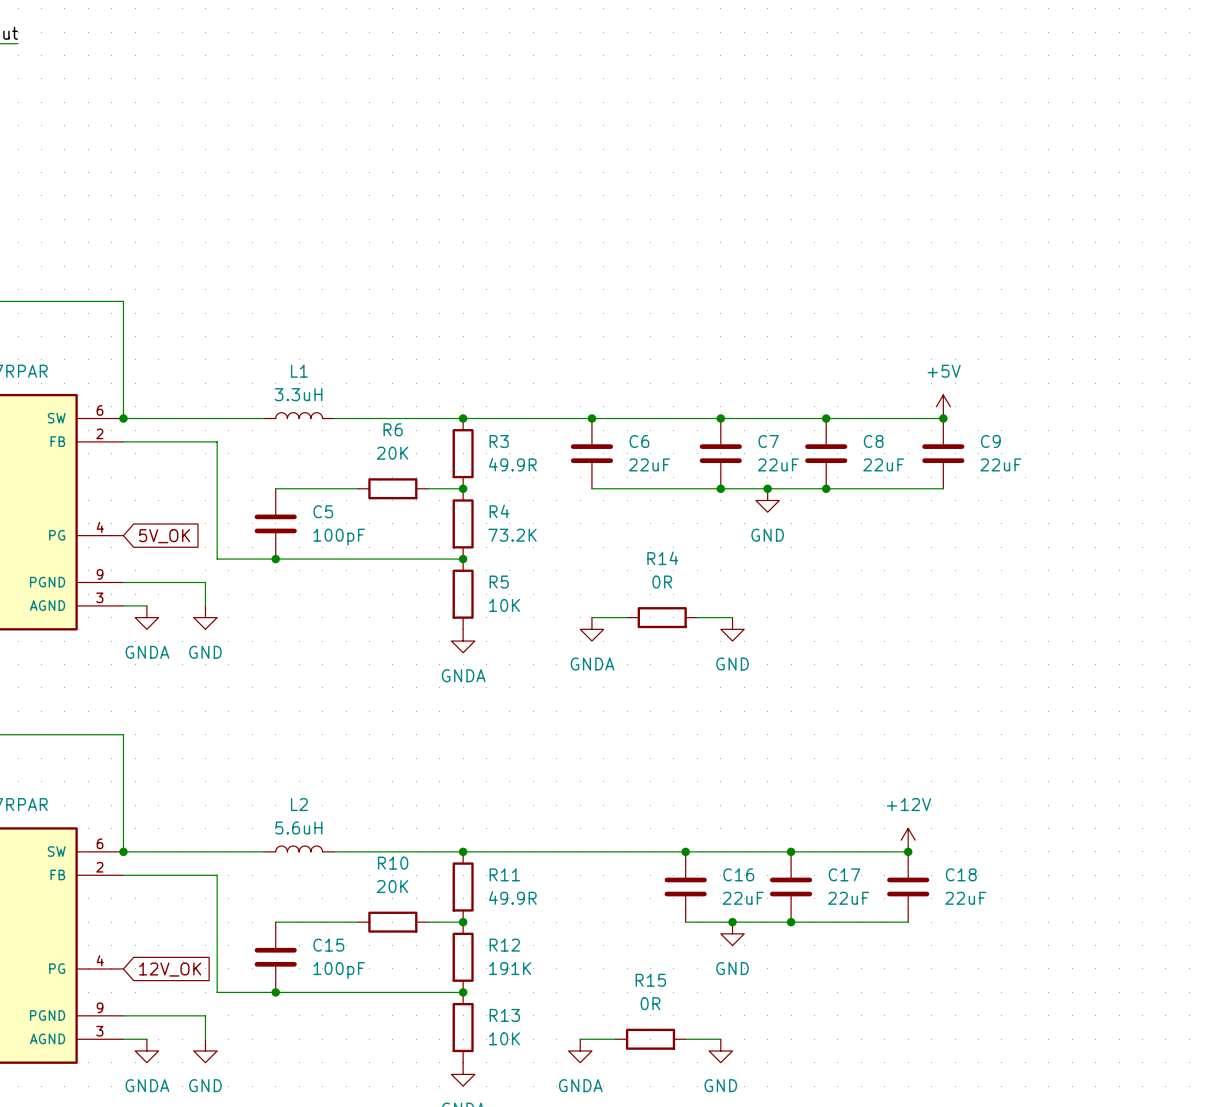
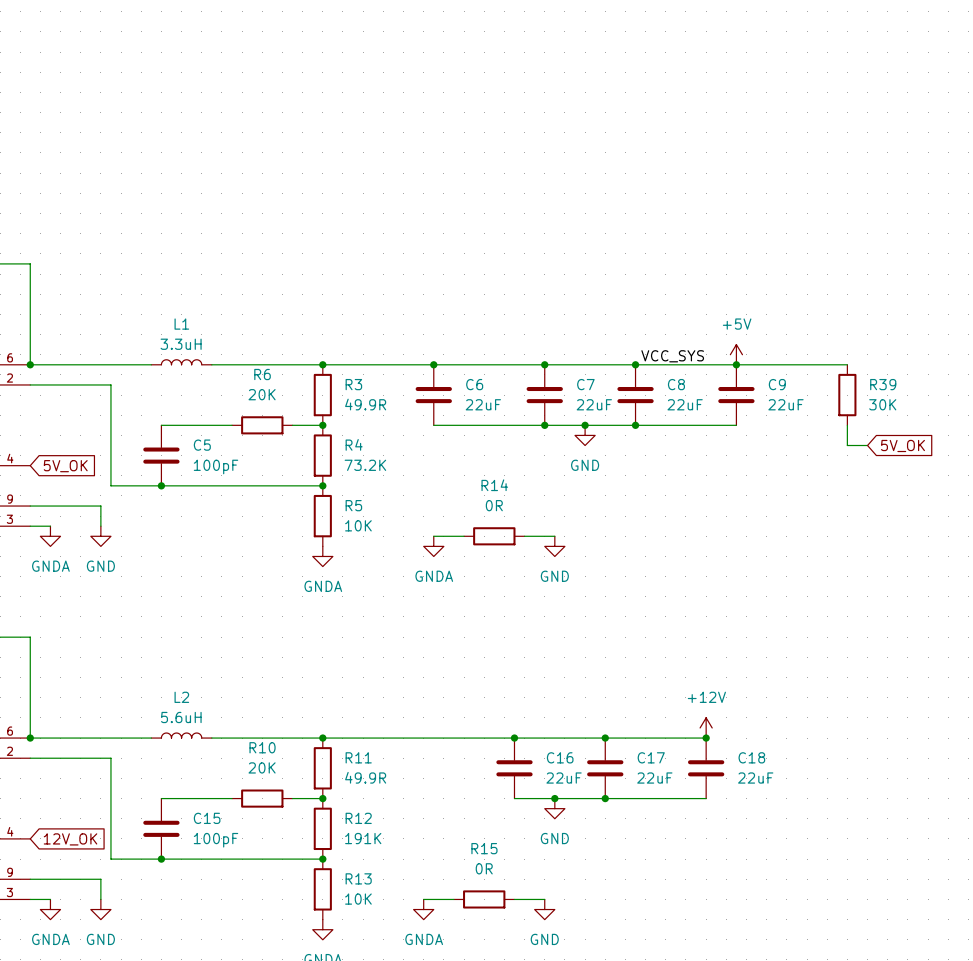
label: none -> VCC_SYS (672, 356)
wire: none -> (736, 364) (847, 364)
R39: none -> 30K (847, 395)
wire: none -> (847, 425) (847, 445) (867, 445)
global label: none -> 5V_OK (902, 445)

